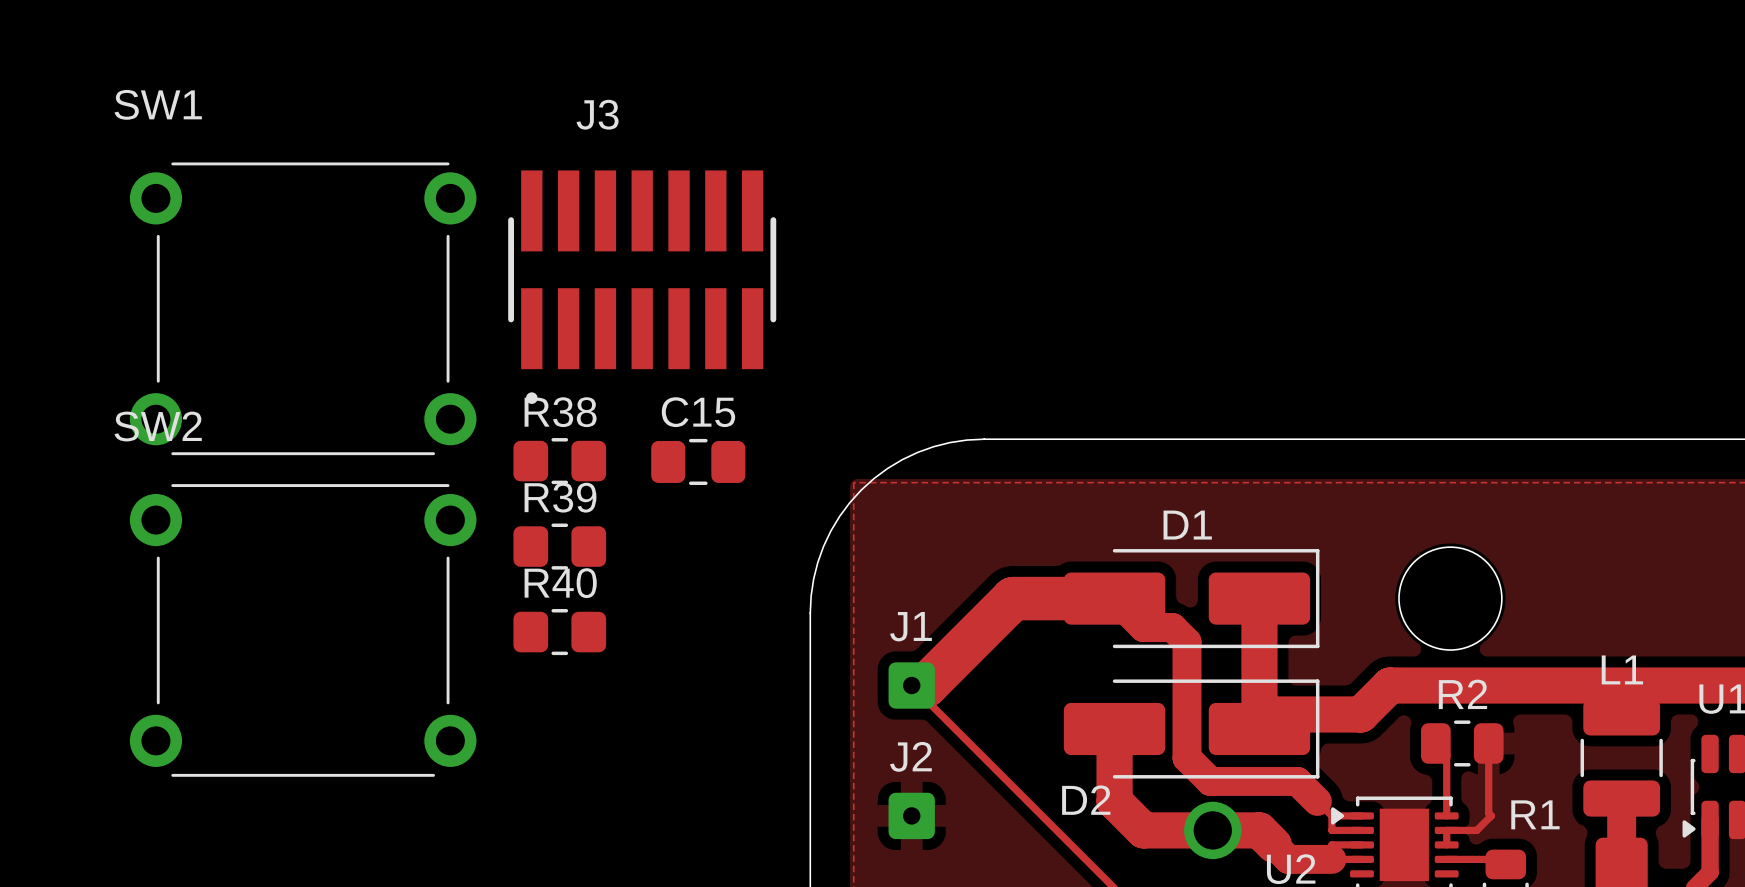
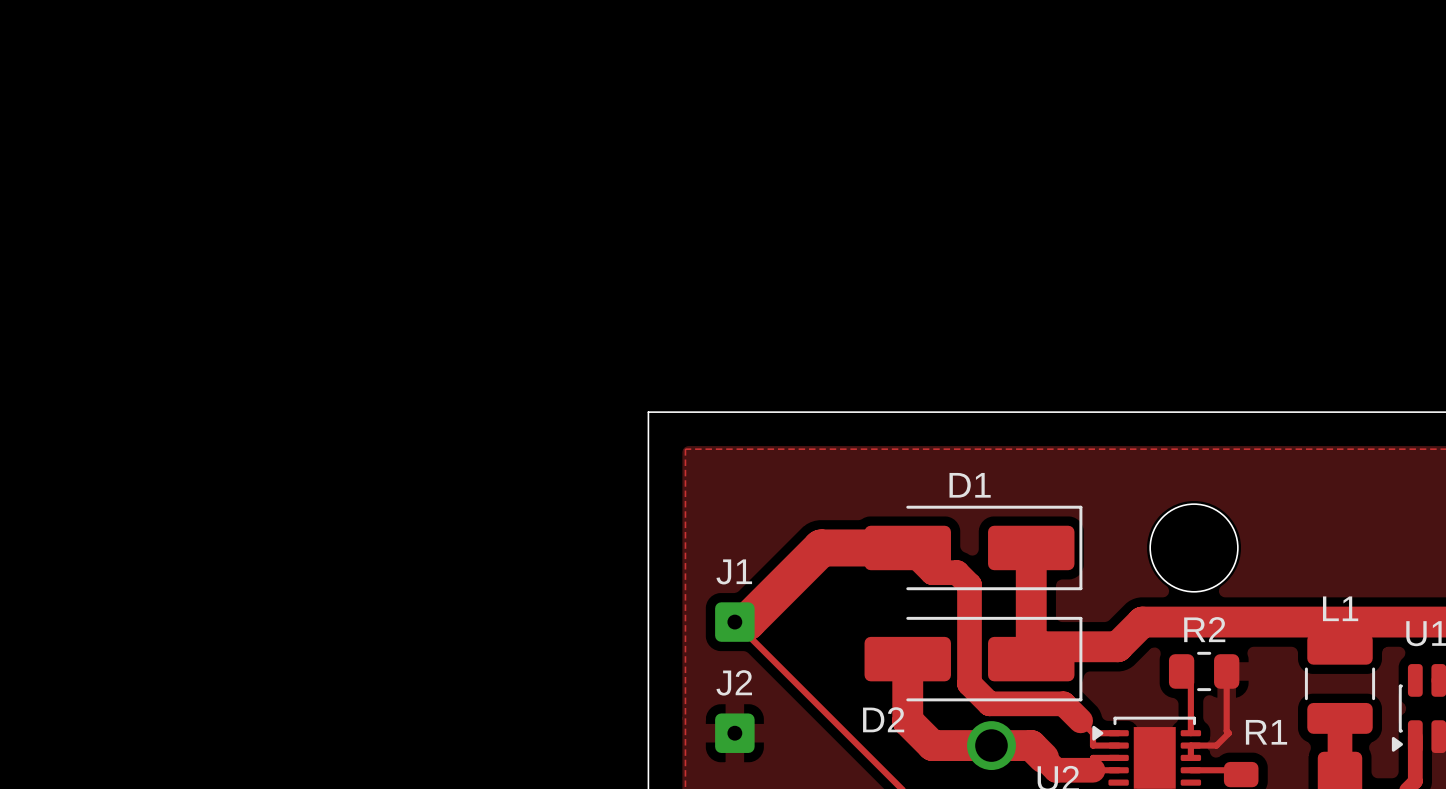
J3: (642, 287) -> none
SW1: (303, 308) -> none
board edge: (984, 439) (950, 442) (917, 452) (887, 468) (861, 490) (839, 516) (823, 546) (813, 579) (810, 613) -> (796, 412) (648, 412) (648, 560)
R38: (559, 461) -> none
C15: (698, 461) -> none
R39: (559, 546) -> none
SW2: (303, 630) -> none
R40: (559, 632) -> none

